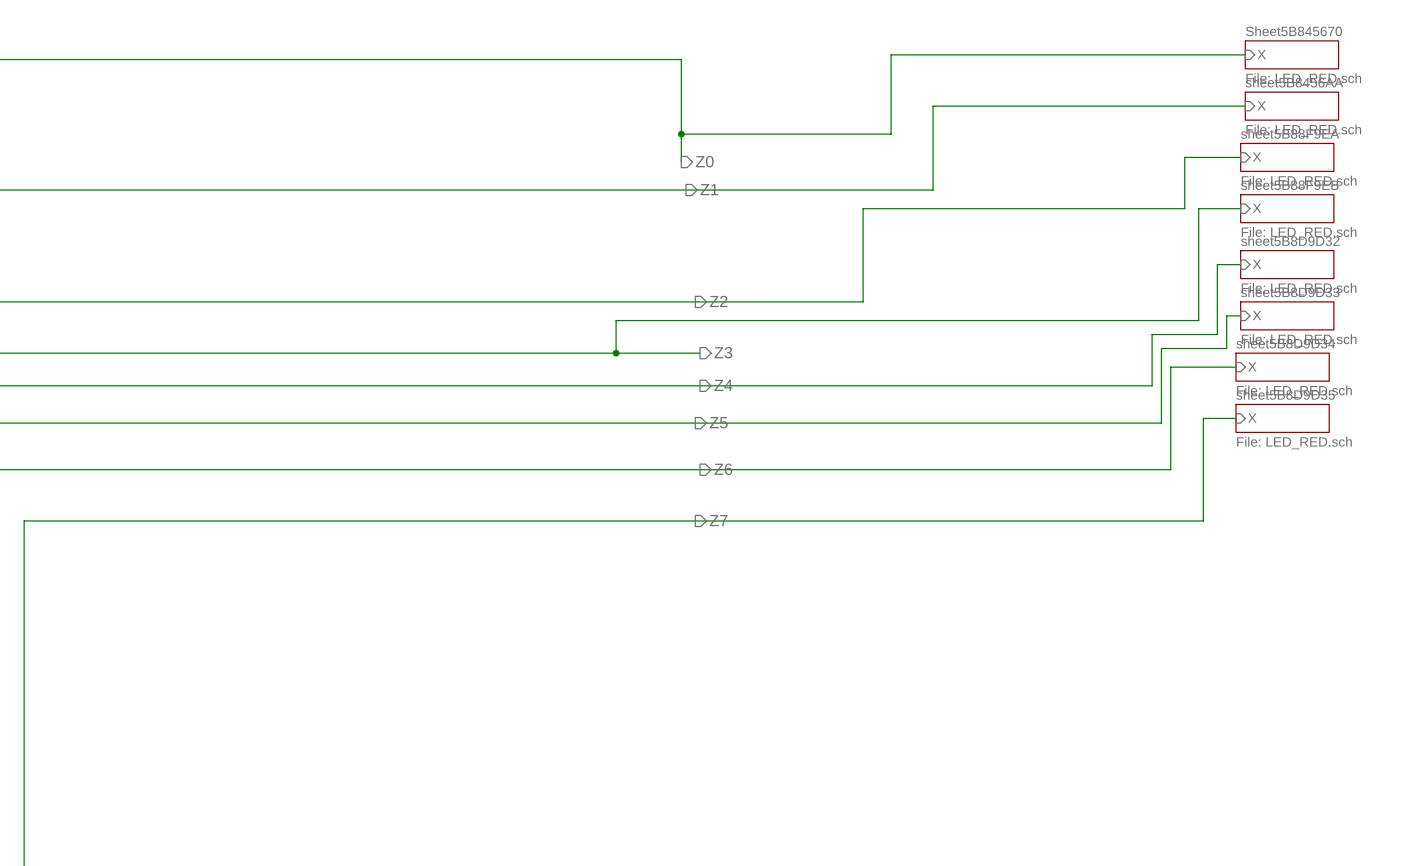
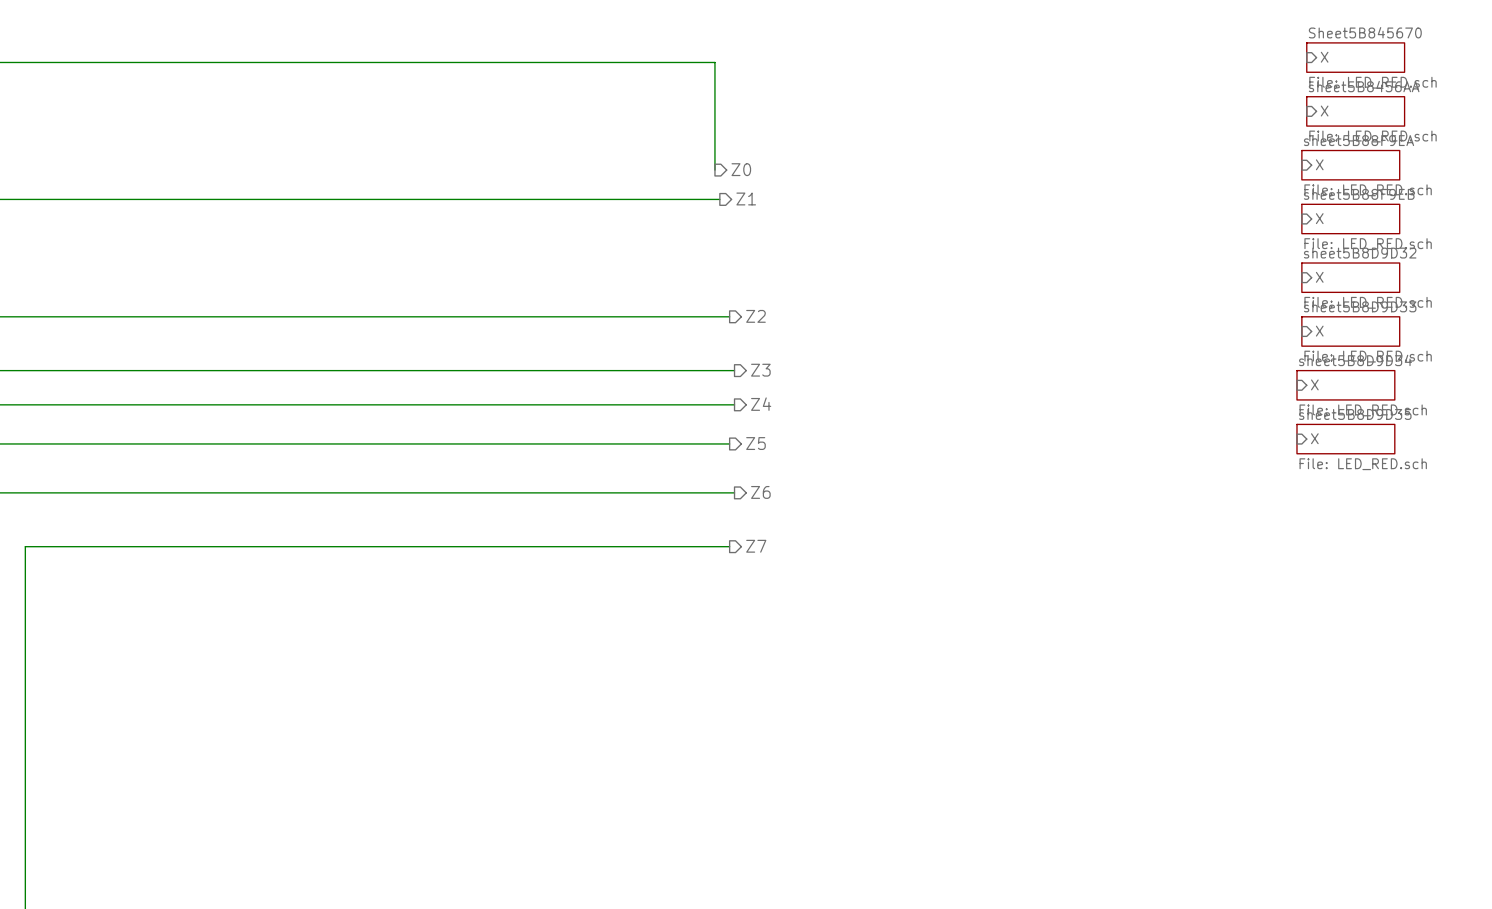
wire: (1245, 54) (891, 54) (891, 134) (681, 134) -> none
wire: (1245, 106) (933, 106) (933, 190) (686, 190) -> none
junction: (681, 134) -> none
wire: (1240, 157) (1184, 157) (1184, 208) (863, 208) (863, 301) (695, 301) -> none
wire: (1240, 208) (1198, 208) (1198, 320) (616, 320) (616, 353) -> none
wire: (1240, 264) (1217, 264) (1217, 334) (1152, 334) (1152, 385) (699, 385) -> none
wire: (1240, 315) (1226, 315) (1226, 348) (1161, 348) (1161, 423) (695, 423) -> none
junction: (616, 353) -> none
wire: (1235, 367) (1170, 367) (1170, 469) (699, 469) -> none
wire: (1235, 418) (1203, 418) (1203, 520) (695, 520) -> none

